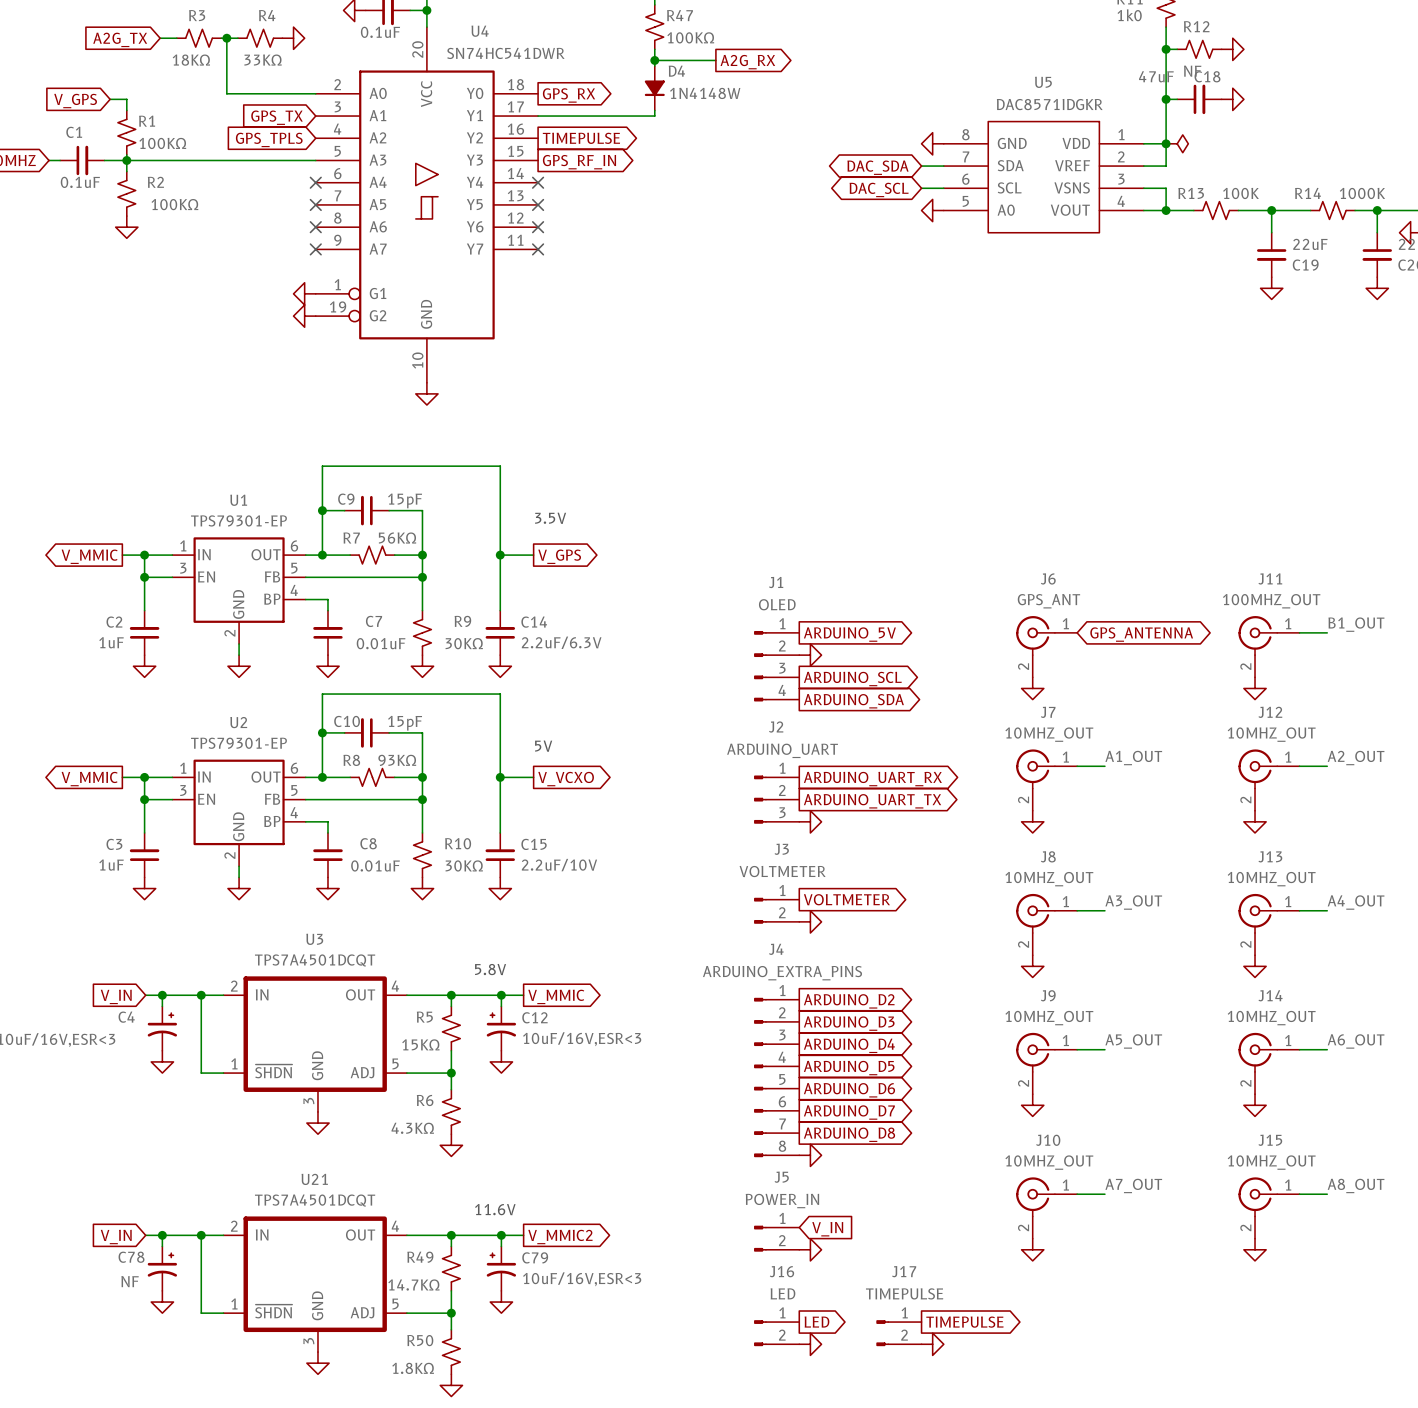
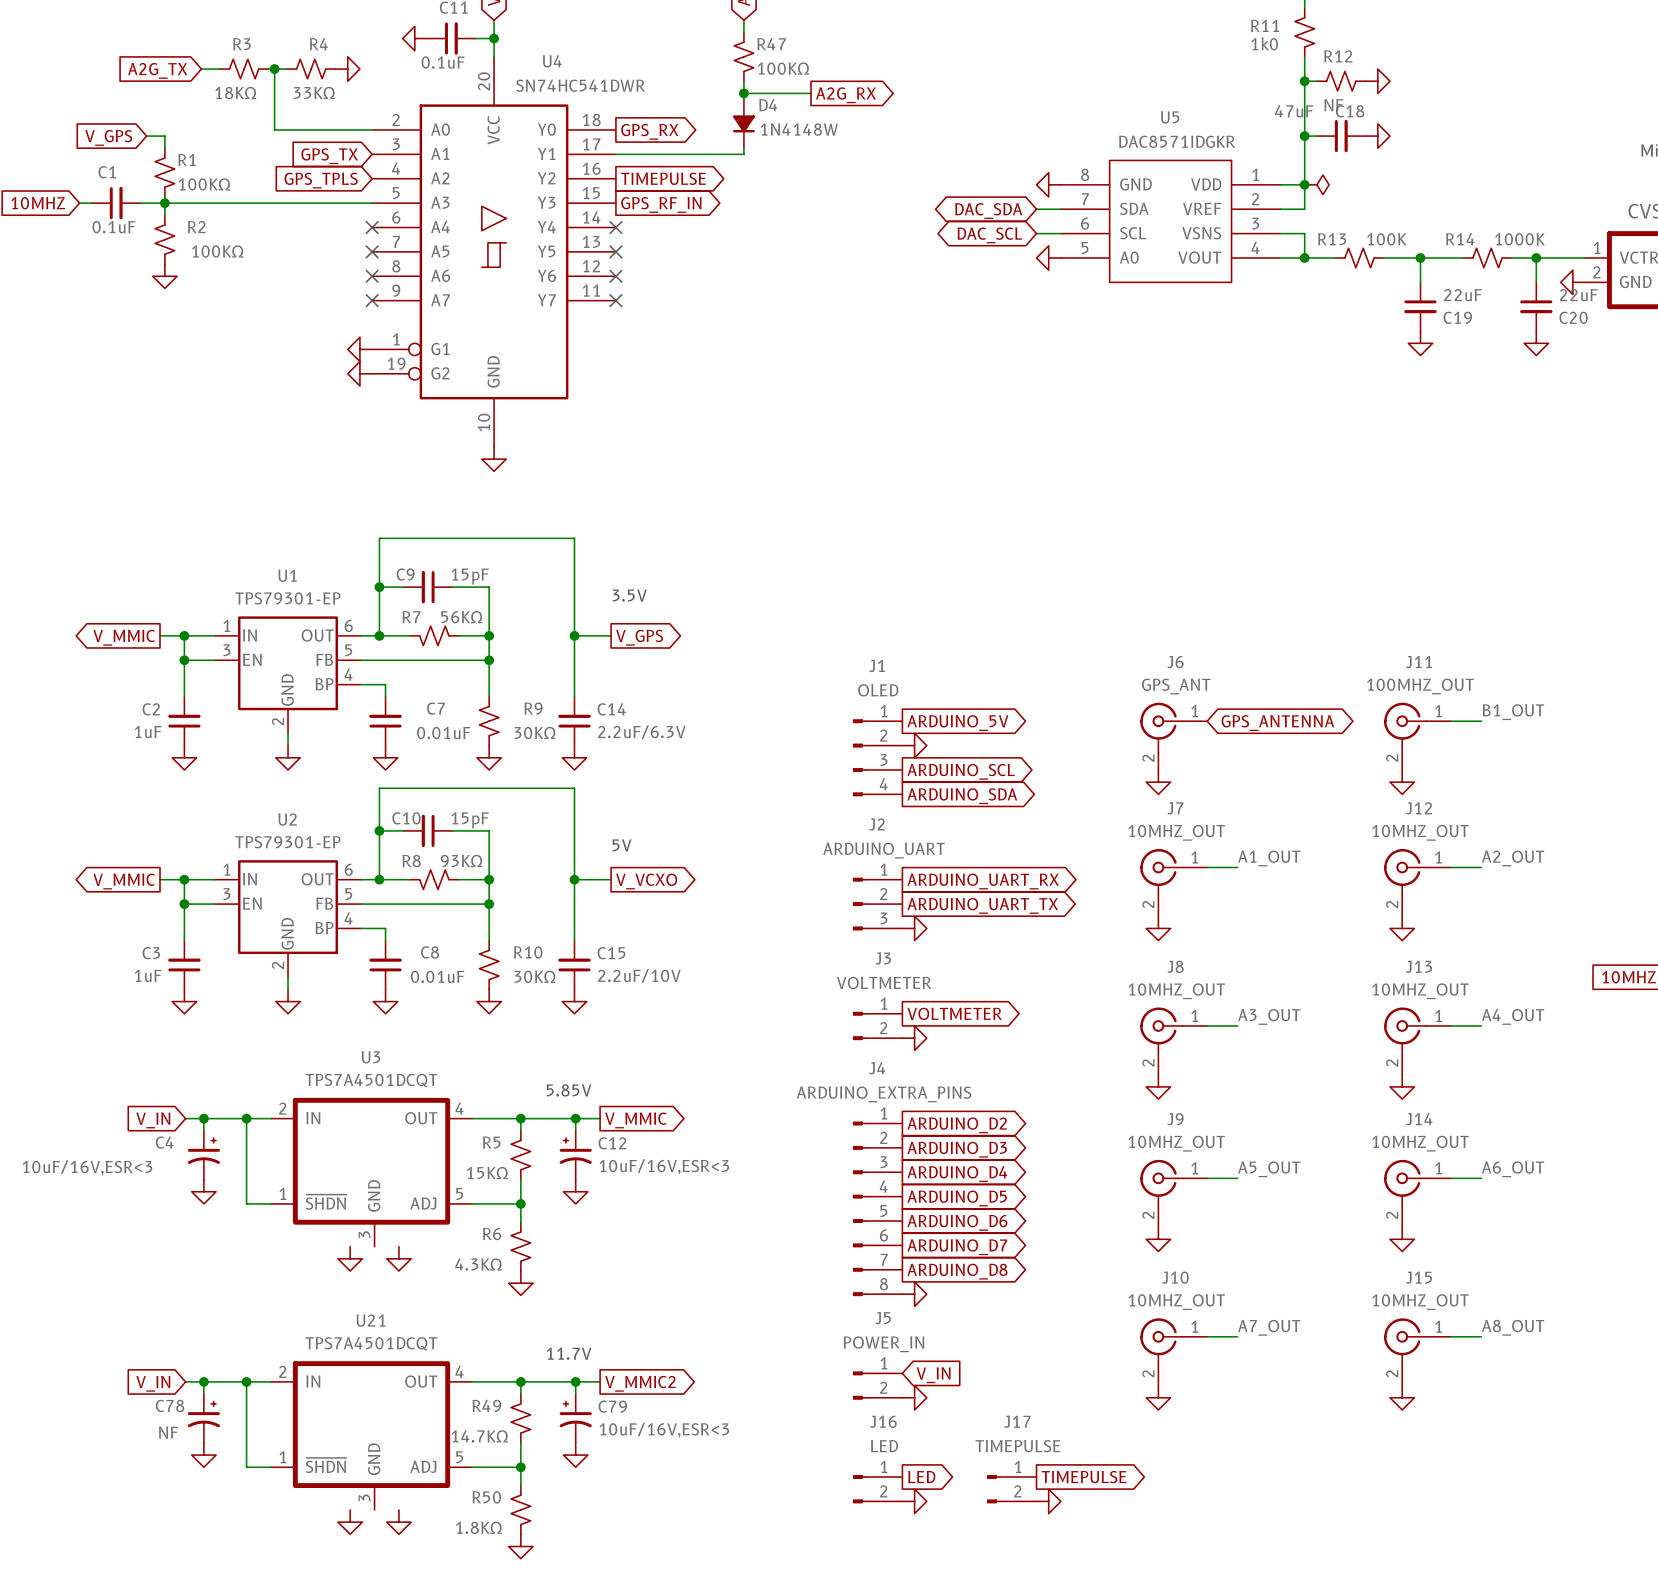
text: 5.8V (490, 969) -> 5.85V (569, 1090)
power symbol: none -> (350, 1258)
power symbol: (317, 1123) -> none
power symbol: none -> (398, 1258)
text: 11.6V (495, 1209) -> 11.7V (569, 1353)
power symbol: none -> (350, 1522)
power symbol: (317, 1363) -> none
power symbol: none -> (398, 1522)

